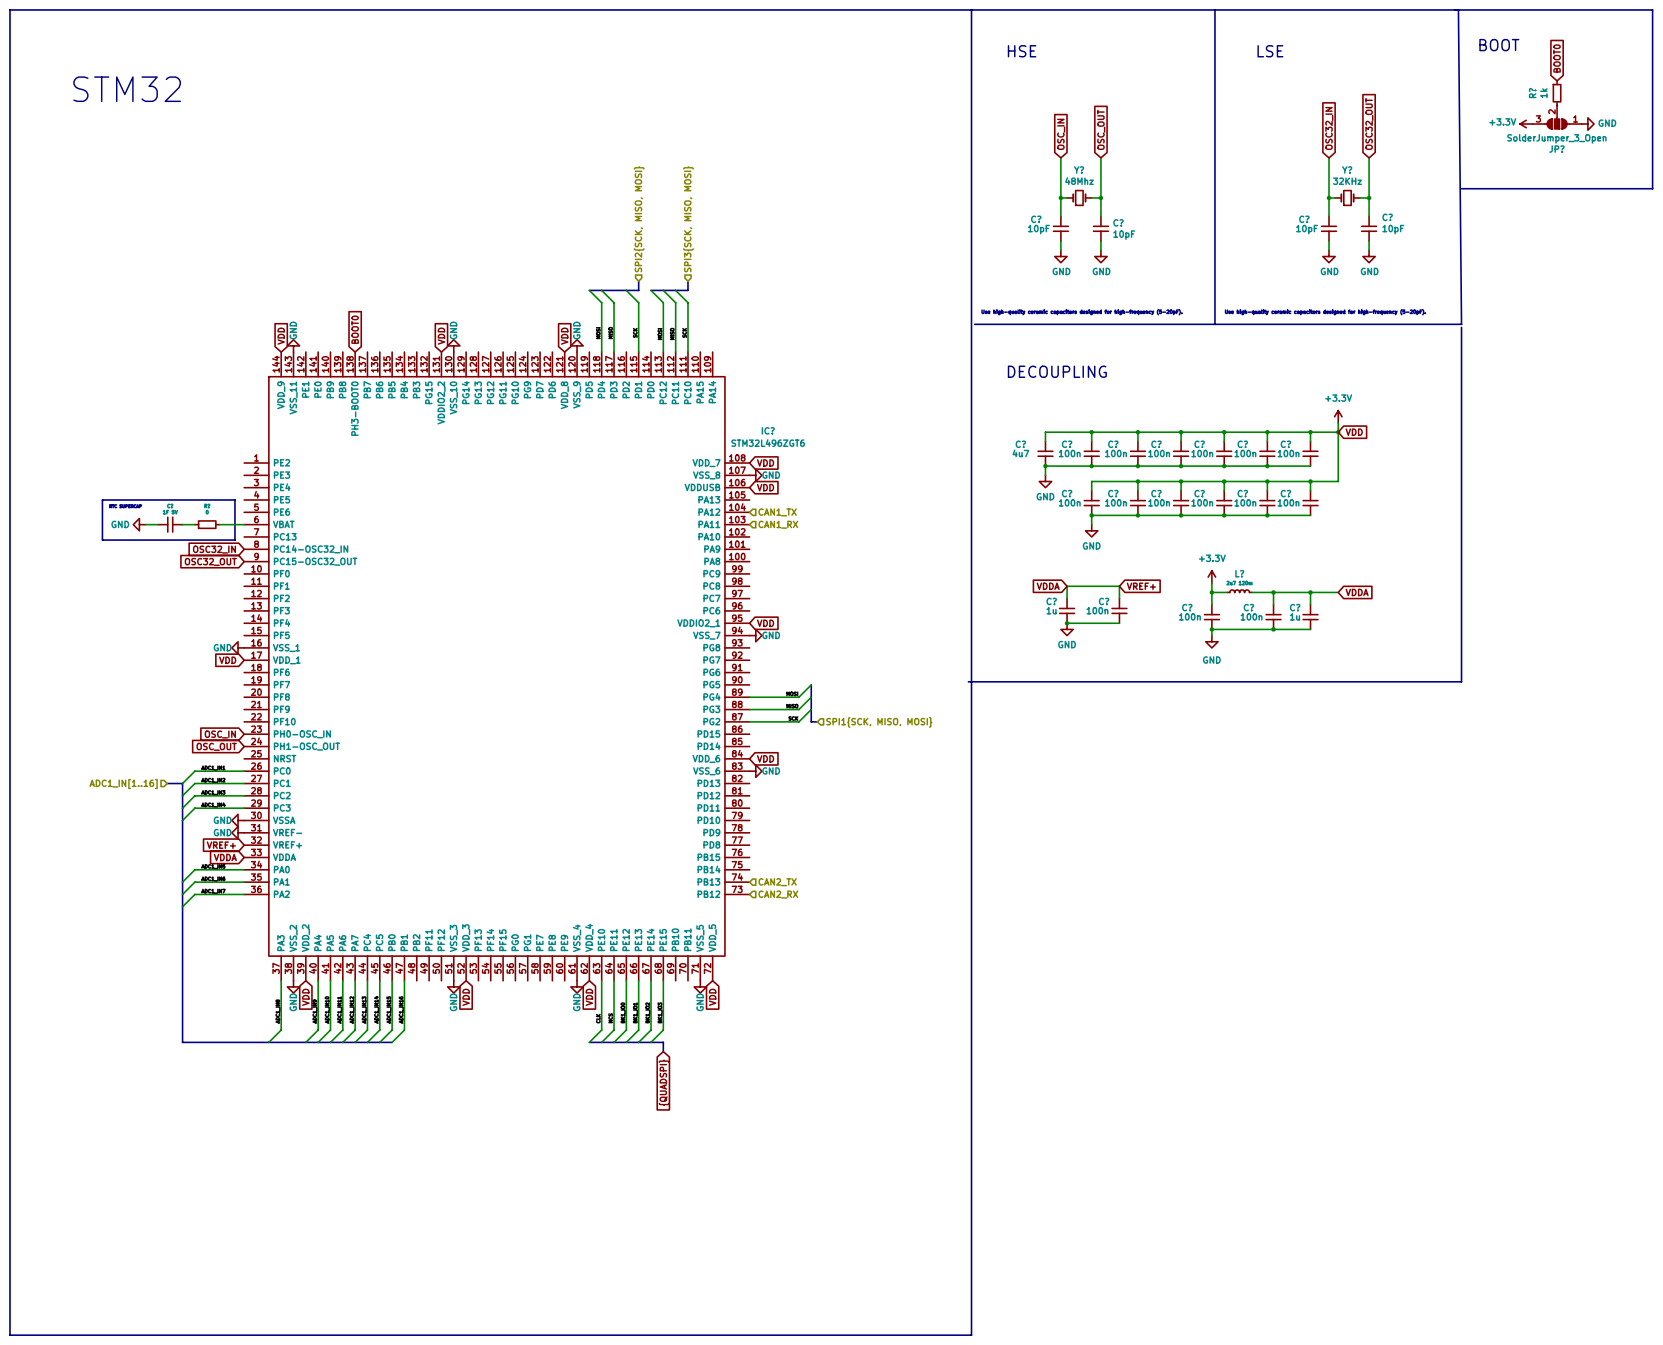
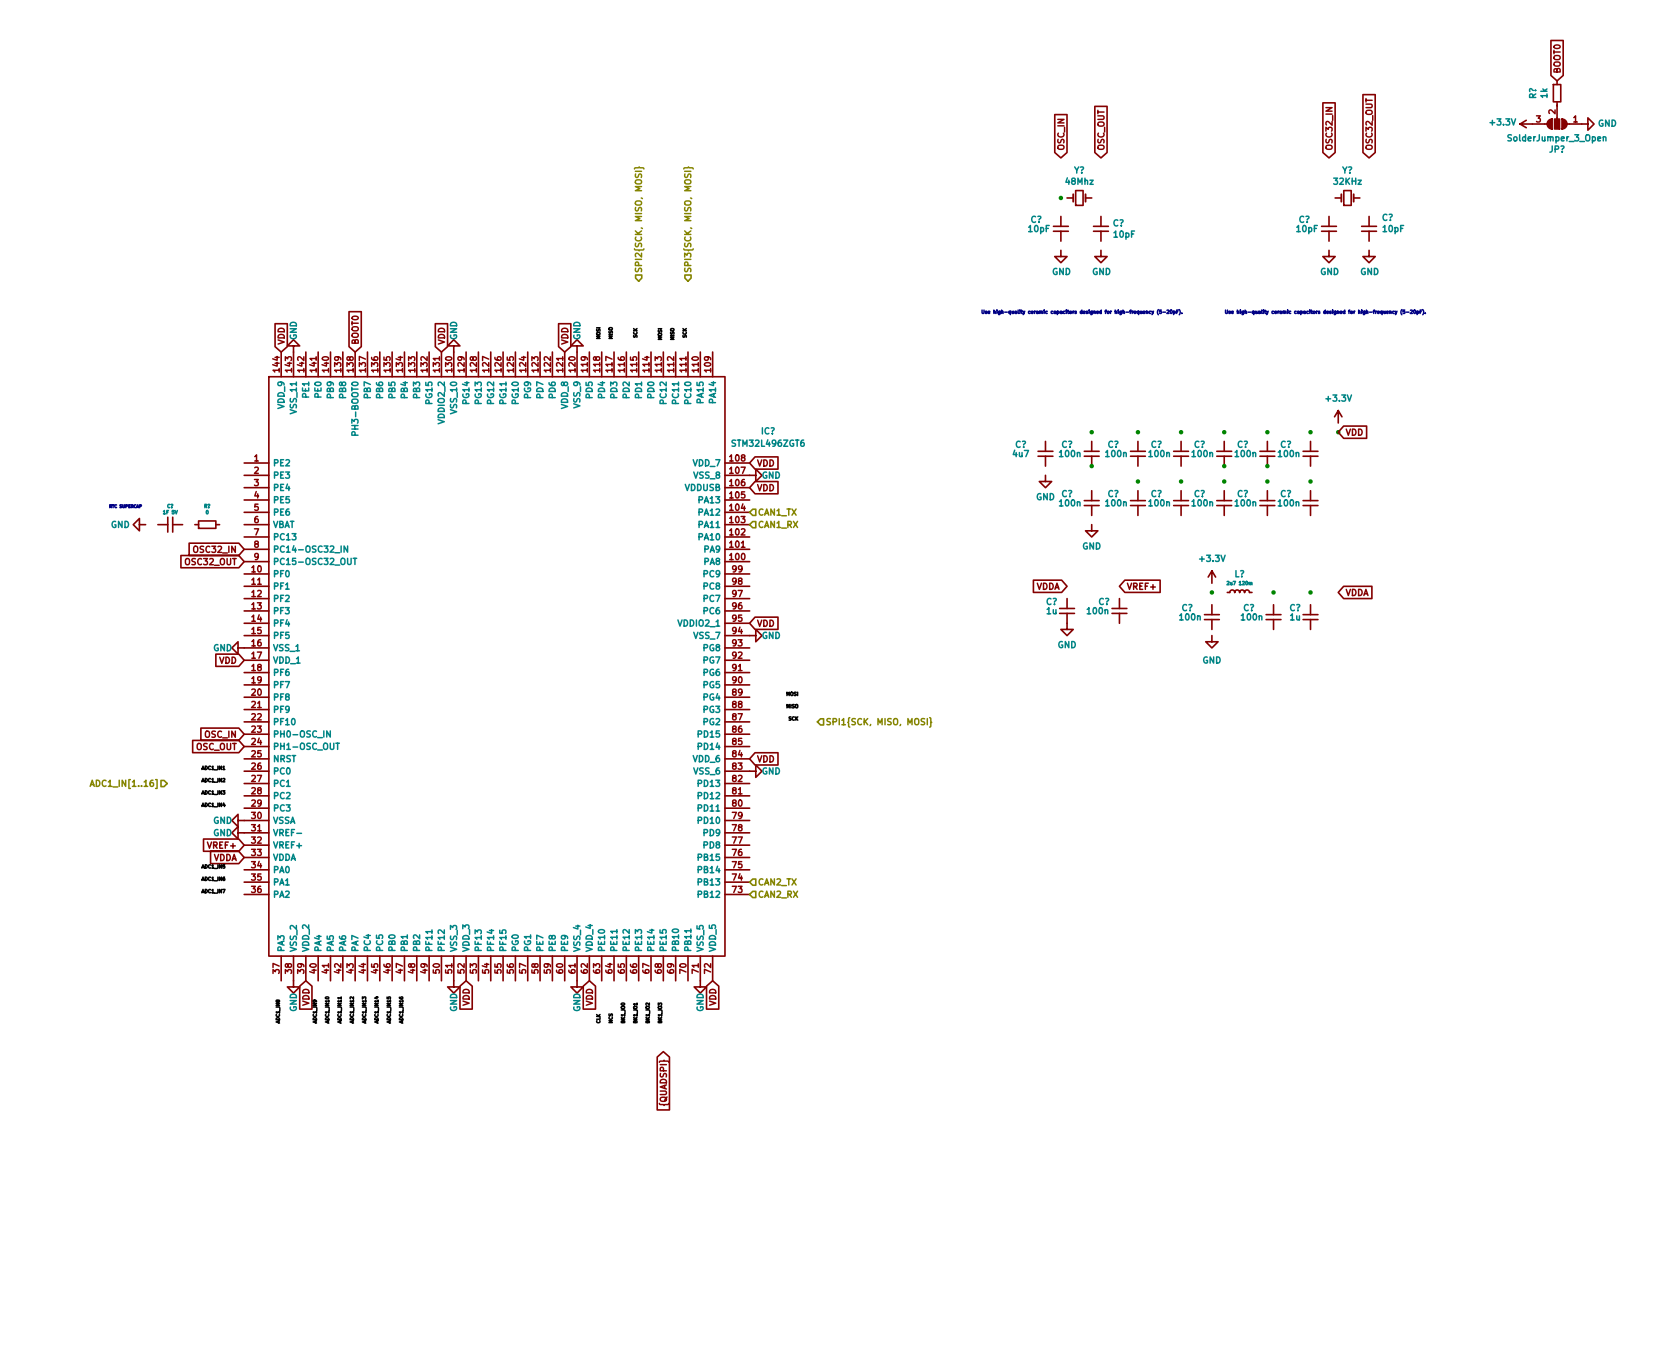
line: (971, 9) (971, 1335) (9, 1335) (9, 9) (1652, 9) (1652, 188) (1461, 188) -> none
line: (1214, 9) (1214, 324) -> none
line: (1458, 9) (1461, 324) (974, 324) -> none
text: BOOT (1499, 45) -> none
text: HSE (1022, 51) -> none
text: LSE (1270, 51) -> none
text: STM32 (127, 89) -> none
wire: (1060, 157) (1060, 216) -> none
wire: (1100, 157) (1100, 216) -> none
wire: (1329, 157) (1329, 216) -> none
wire: (1369, 157) (1369, 216) -> none
wire: (1060, 197) (1067, 197) -> none
wire: (1091, 197) (1100, 197) -> none
junction: (1100, 197) -> none
wire: (1329, 197) (1335, 197) -> none
junction: (1329, 197) -> none
wire: (1359, 197) (1369, 197) -> none
junction: (1369, 197) -> none
wire: (1060, 241) (1060, 250) -> none
wire: (1100, 241) (1100, 250) -> none
wire: (1329, 241) (1329, 250) -> none
wire: (1369, 241) (1369, 250) -> none
bus: (638, 281) (638, 290) (589, 290) -> none
bus: (687, 281) (687, 290) (651, 290) -> none
wire: (589, 290) (601, 302) (601, 352) -> none
wire: (601, 290) (614, 302) (614, 352) -> none
wire: (626, 290) (638, 302) (638, 352) -> none
wire: (651, 290) (663, 302) (663, 352) -> none
wire: (663, 290) (675, 302) (675, 352) -> none
wire: (675, 290) (687, 302) (687, 352) -> none
line: (1461, 327) (1461, 681) (968, 681) -> none
text: DECOUPLING (1057, 371) -> none
wire: (1338, 422) (1338, 481) (1091, 481) (1091, 490) -> none
wire: (1091, 432) (1091, 441) -> none
wire: (1137, 432) (1137, 441) -> none
wire: (1181, 432) (1181, 441) -> none
wire: (1224, 432) (1224, 441) -> none
wire: (1267, 432) (1267, 441) -> none
wire: (1310, 432) (1310, 441) -> none
wire: (1338, 432) (1045, 432) (1045, 441) -> none
junction: (1045, 466) -> none
junction: (1137, 466) -> none
junction: (1181, 466) -> none
wire: (1310, 466) (1045, 466) (1045, 475) -> none
wire: (1137, 481) (1137, 490) -> none
wire: (1181, 481) (1181, 490) -> none
wire: (1224, 481) (1224, 490) -> none
wire: (1267, 481) (1267, 490) -> none
wire: (1310, 481) (1310, 490) -> none
line: (102, 499) (234, 499) (234, 540) (102, 540) (102, 499) -> none
junction: (1091, 515) -> none
junction: (1137, 515) -> none
junction: (1181, 515) -> none
junction: (1224, 515) -> none
junction: (1267, 515) -> none
wire: (1310, 515) (1091, 515) (1091, 524) -> none
wire: (145, 524) (157, 524) -> none
wire: (182, 524) (194, 524) -> none
wire: (219, 524) (244, 524) -> none
wire: (1211, 583) (1211, 604) -> none
wire: (1211, 592) (1227, 592) -> none
wire: (1251, 592) (1338, 592) -> none
wire: (1273, 592) (1273, 604) -> none
wire: (1310, 592) (1310, 604) -> none
wire: (1067, 598) (1067, 586) (1119, 586) (1119, 598) -> none
wire: (1067, 623) (1119, 623) -> none
junction: (1067, 623) -> none
junction: (1211, 629) -> none
junction: (1273, 629) -> none
wire: (1310, 629) (1211, 629) (1211, 635) -> none
wire: (811, 684) (798, 697) (749, 697) -> none
bus: (811, 684) (811, 721) (817, 721) -> none
wire: (811, 697) (798, 709) (749, 709) -> none
wire: (811, 709) (798, 721) (749, 721) -> none
wire: (244, 771) (194, 771) (182, 783) -> none
bus: (167, 783) (182, 783) (182, 1042) (392, 1042) -> none
wire: (244, 783) (194, 783) (182, 795) -> none
wire: (244, 795) (194, 795) (182, 808) -> none
wire: (244, 808) (194, 808) (182, 820) -> none
wire: (244, 869) (194, 869) (182, 882) -> none
wire: (244, 882) (194, 882) (182, 894) -> none
wire: (244, 894) (194, 894) (182, 906) -> none
wire: (281, 980) (281, 1030) (268, 1042) -> none
wire: (318, 980) (318, 1030) (305, 1042) -> none
wire: (330, 980) (330, 1030) (318, 1042) -> none
wire: (342, 980) (342, 1030) (330, 1042) -> none
wire: (355, 980) (355, 1030) (342, 1042) -> none
wire: (367, 980) (367, 1030) (355, 1042) -> none
wire: (379, 980) (379, 1030) (367, 1042) -> none
wire: (392, 980) (392, 1030) (379, 1042) -> none
wire: (404, 980) (404, 1030) (392, 1042) -> none
wire: (601, 980) (601, 1030) (589, 1042) -> none
wire: (614, 980) (614, 1030) (601, 1042) -> none
wire: (626, 980) (626, 1030) (614, 1042) -> none
wire: (638, 980) (638, 1030) (626, 1042) -> none
wire: (651, 980) (651, 1030) (638, 1042) -> none
wire: (663, 980) (663, 1030) (651, 1042) -> none
bus: (589, 1042) (663, 1042) (663, 1051) -> none

